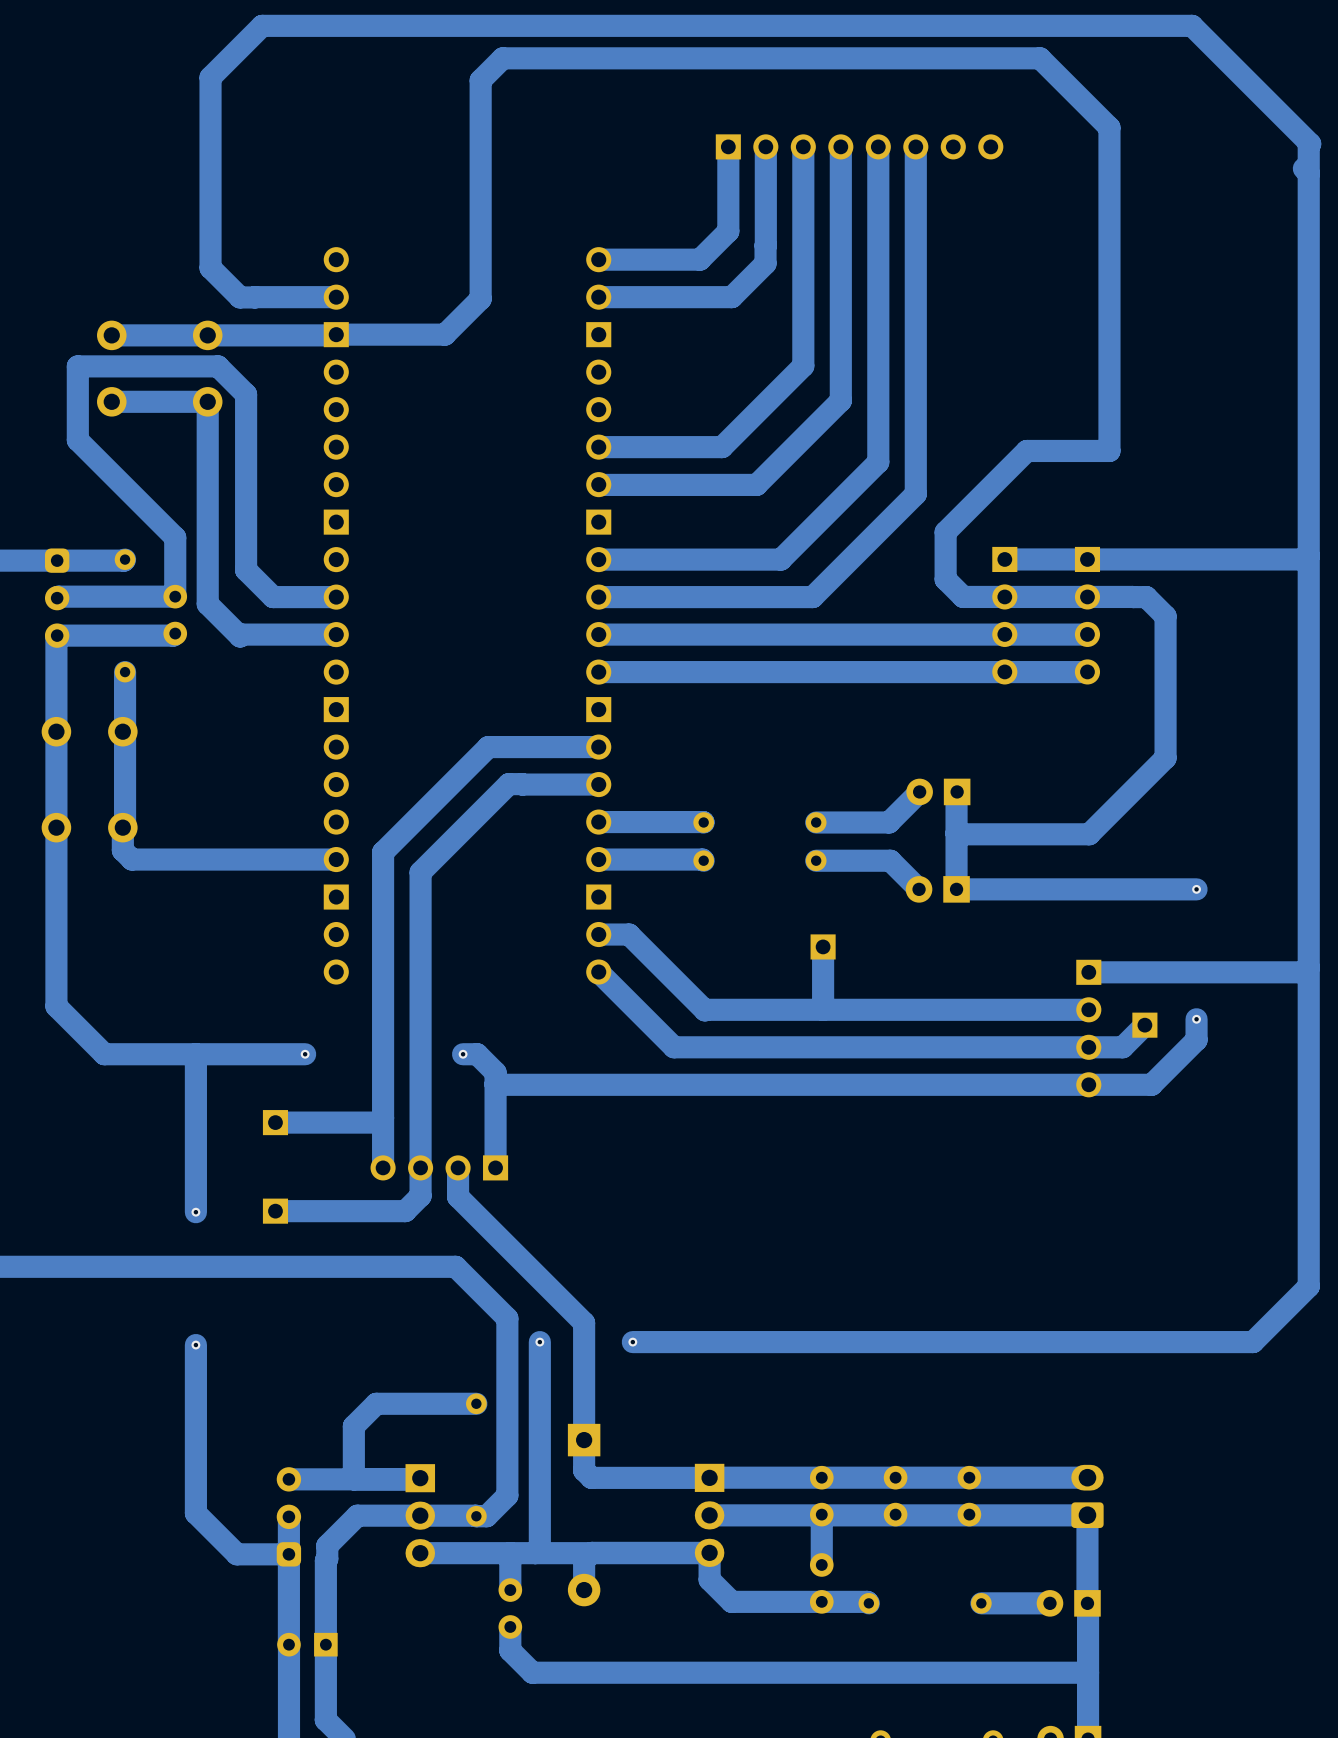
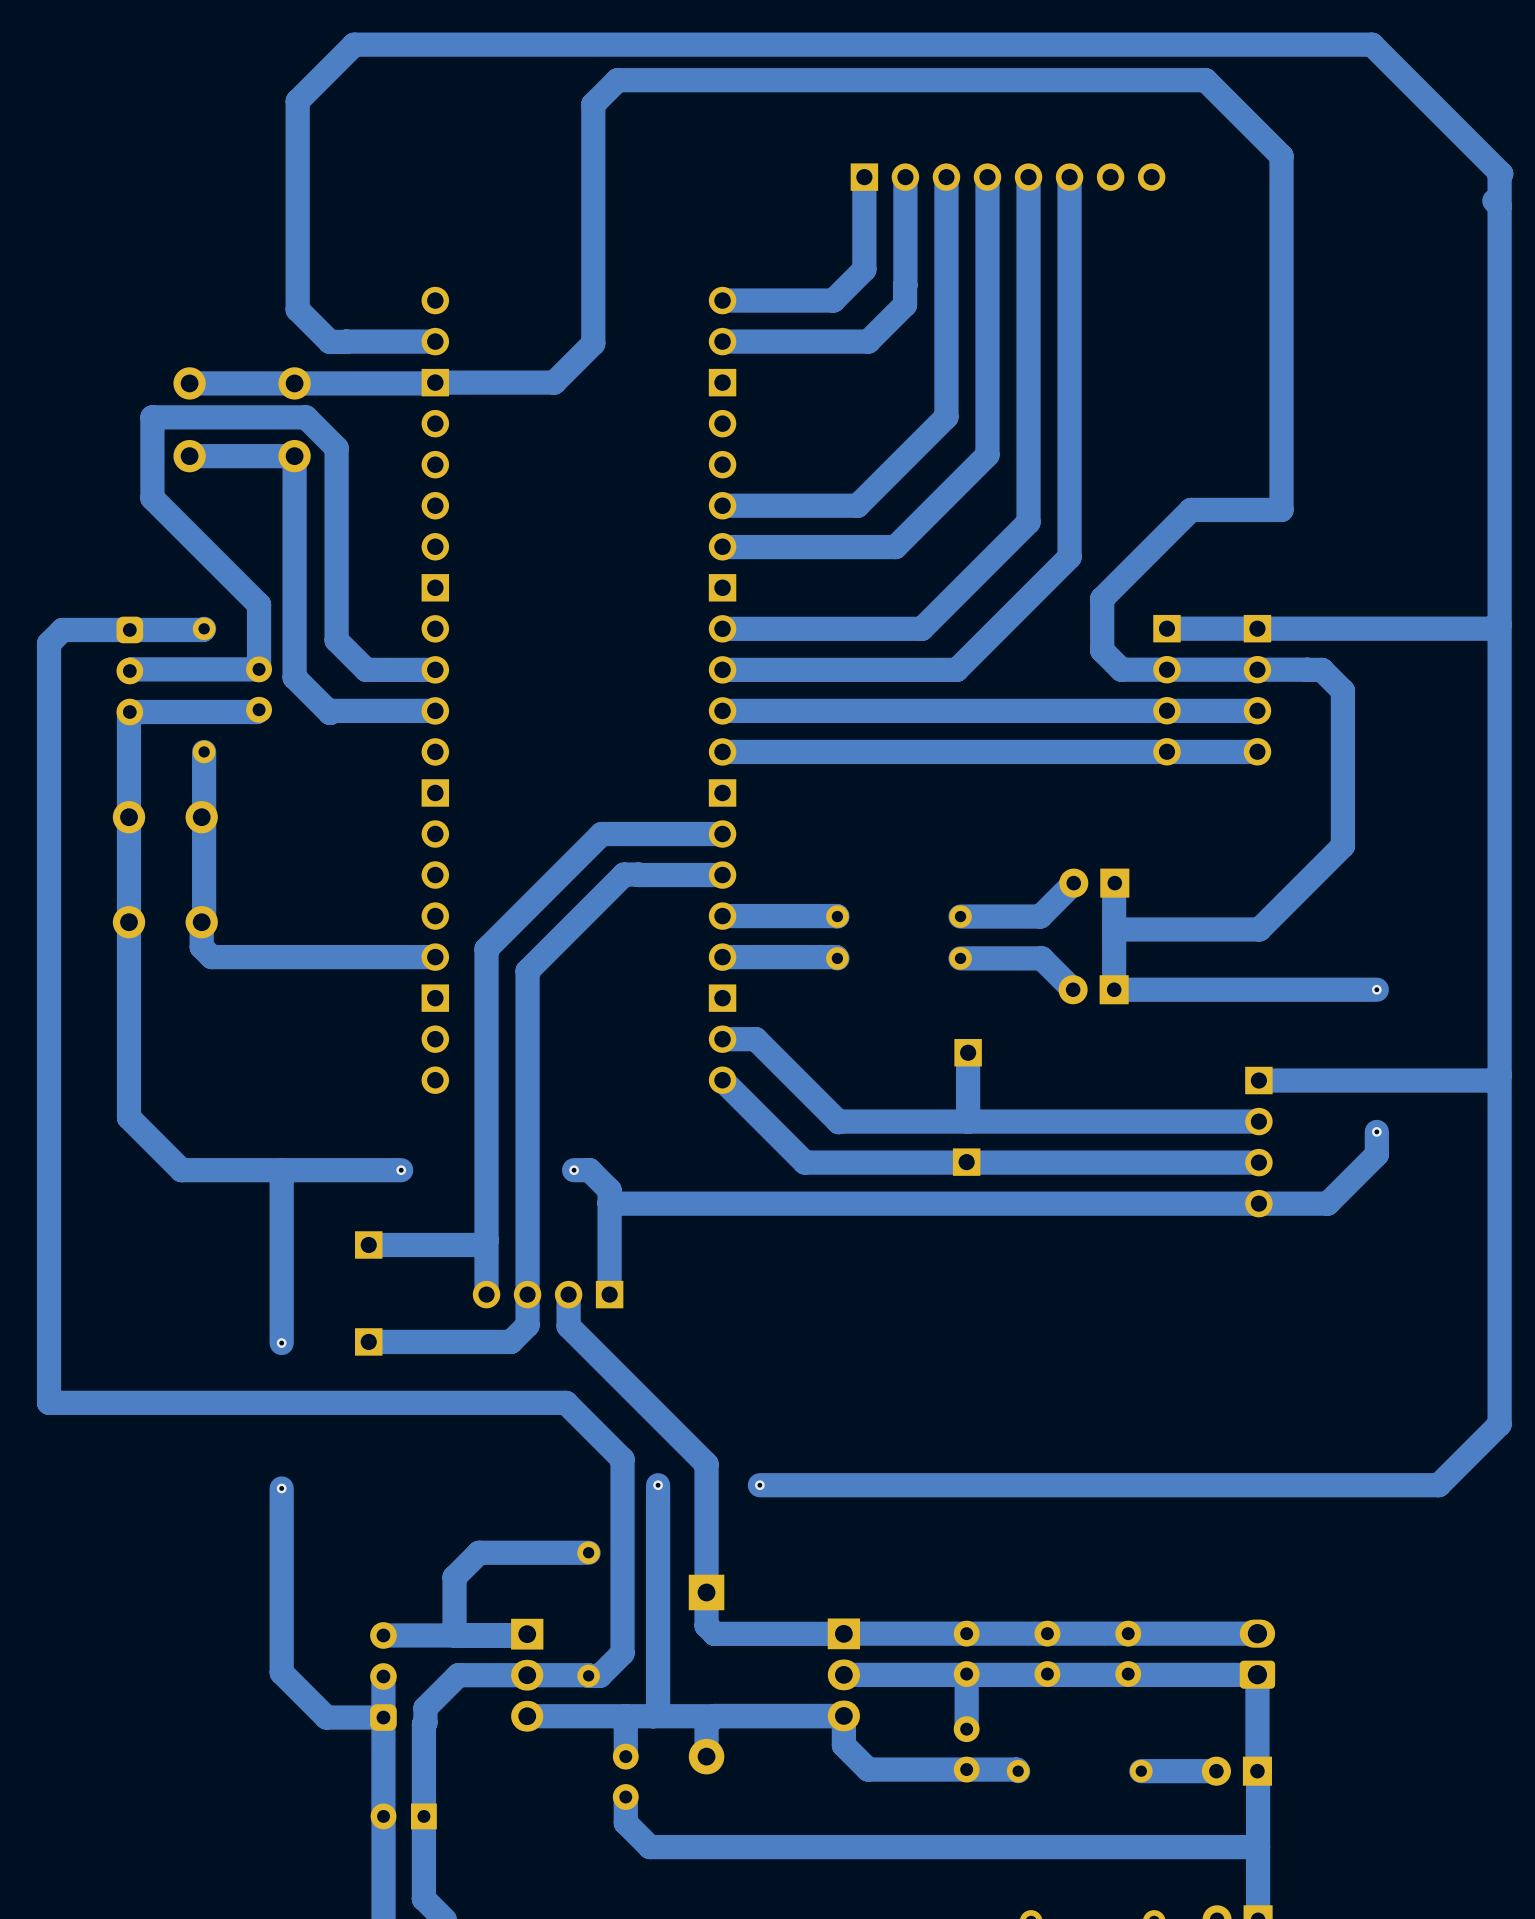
track: (1144, 1025) (1122, 1047) (1088, 1047) -> none
part position: (1144, 1025) -> (966, 1162)

